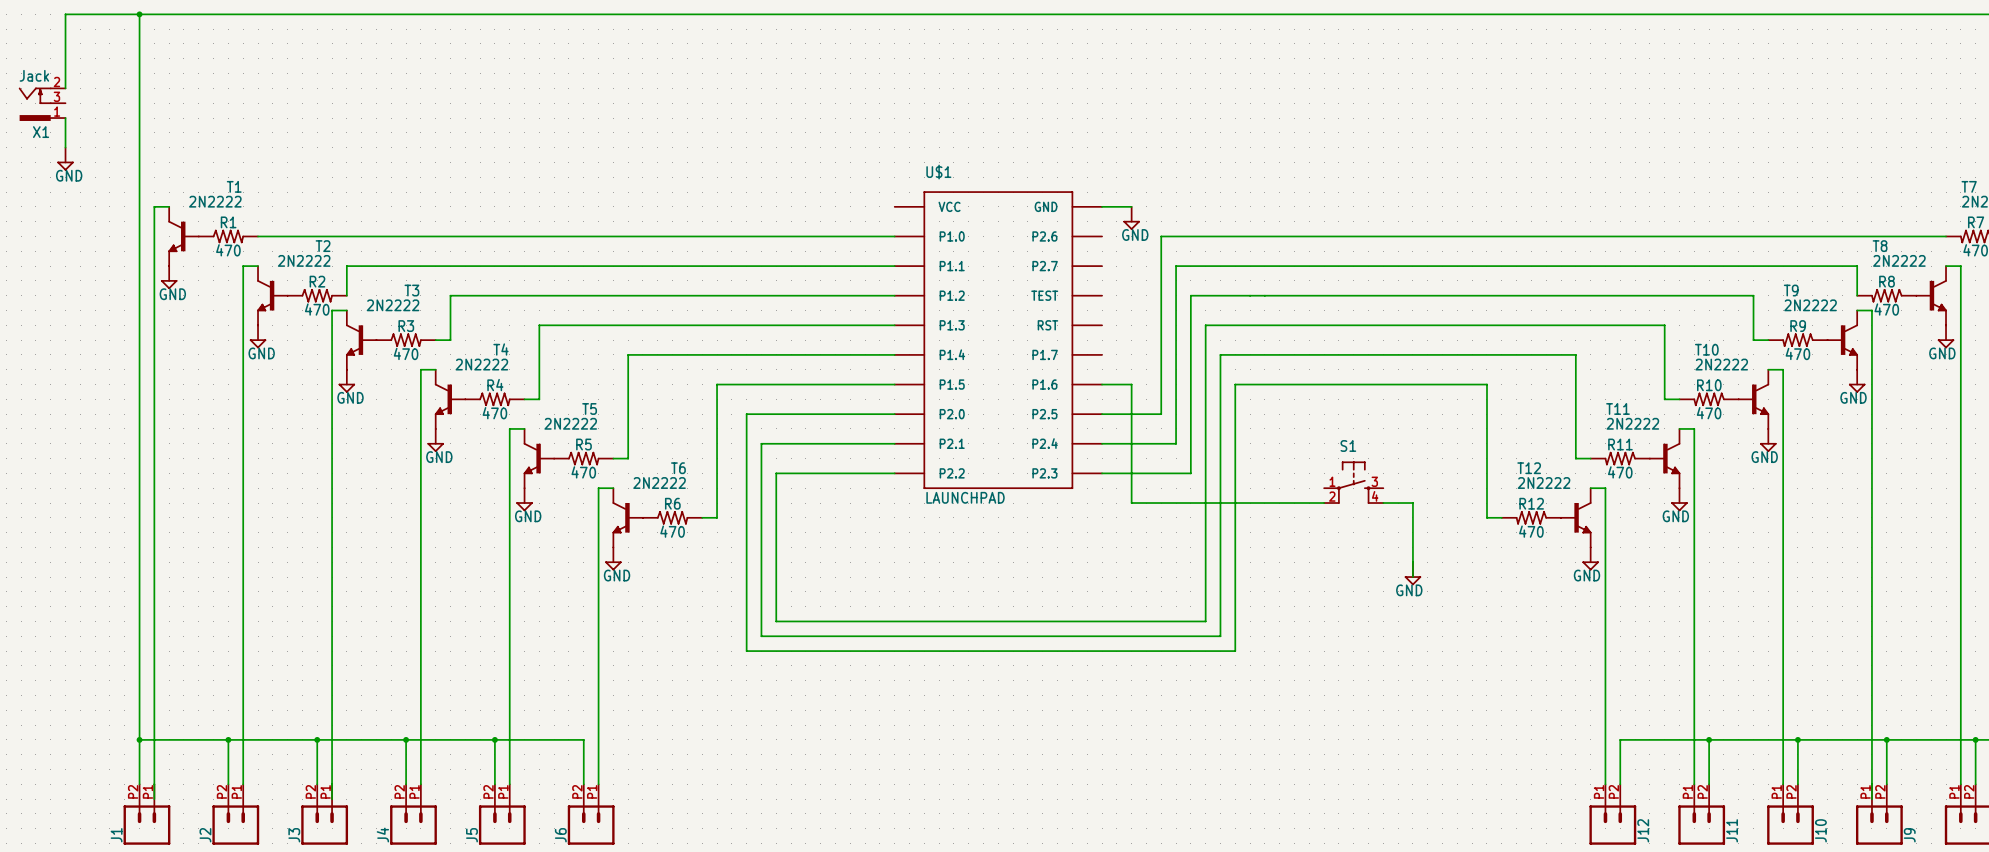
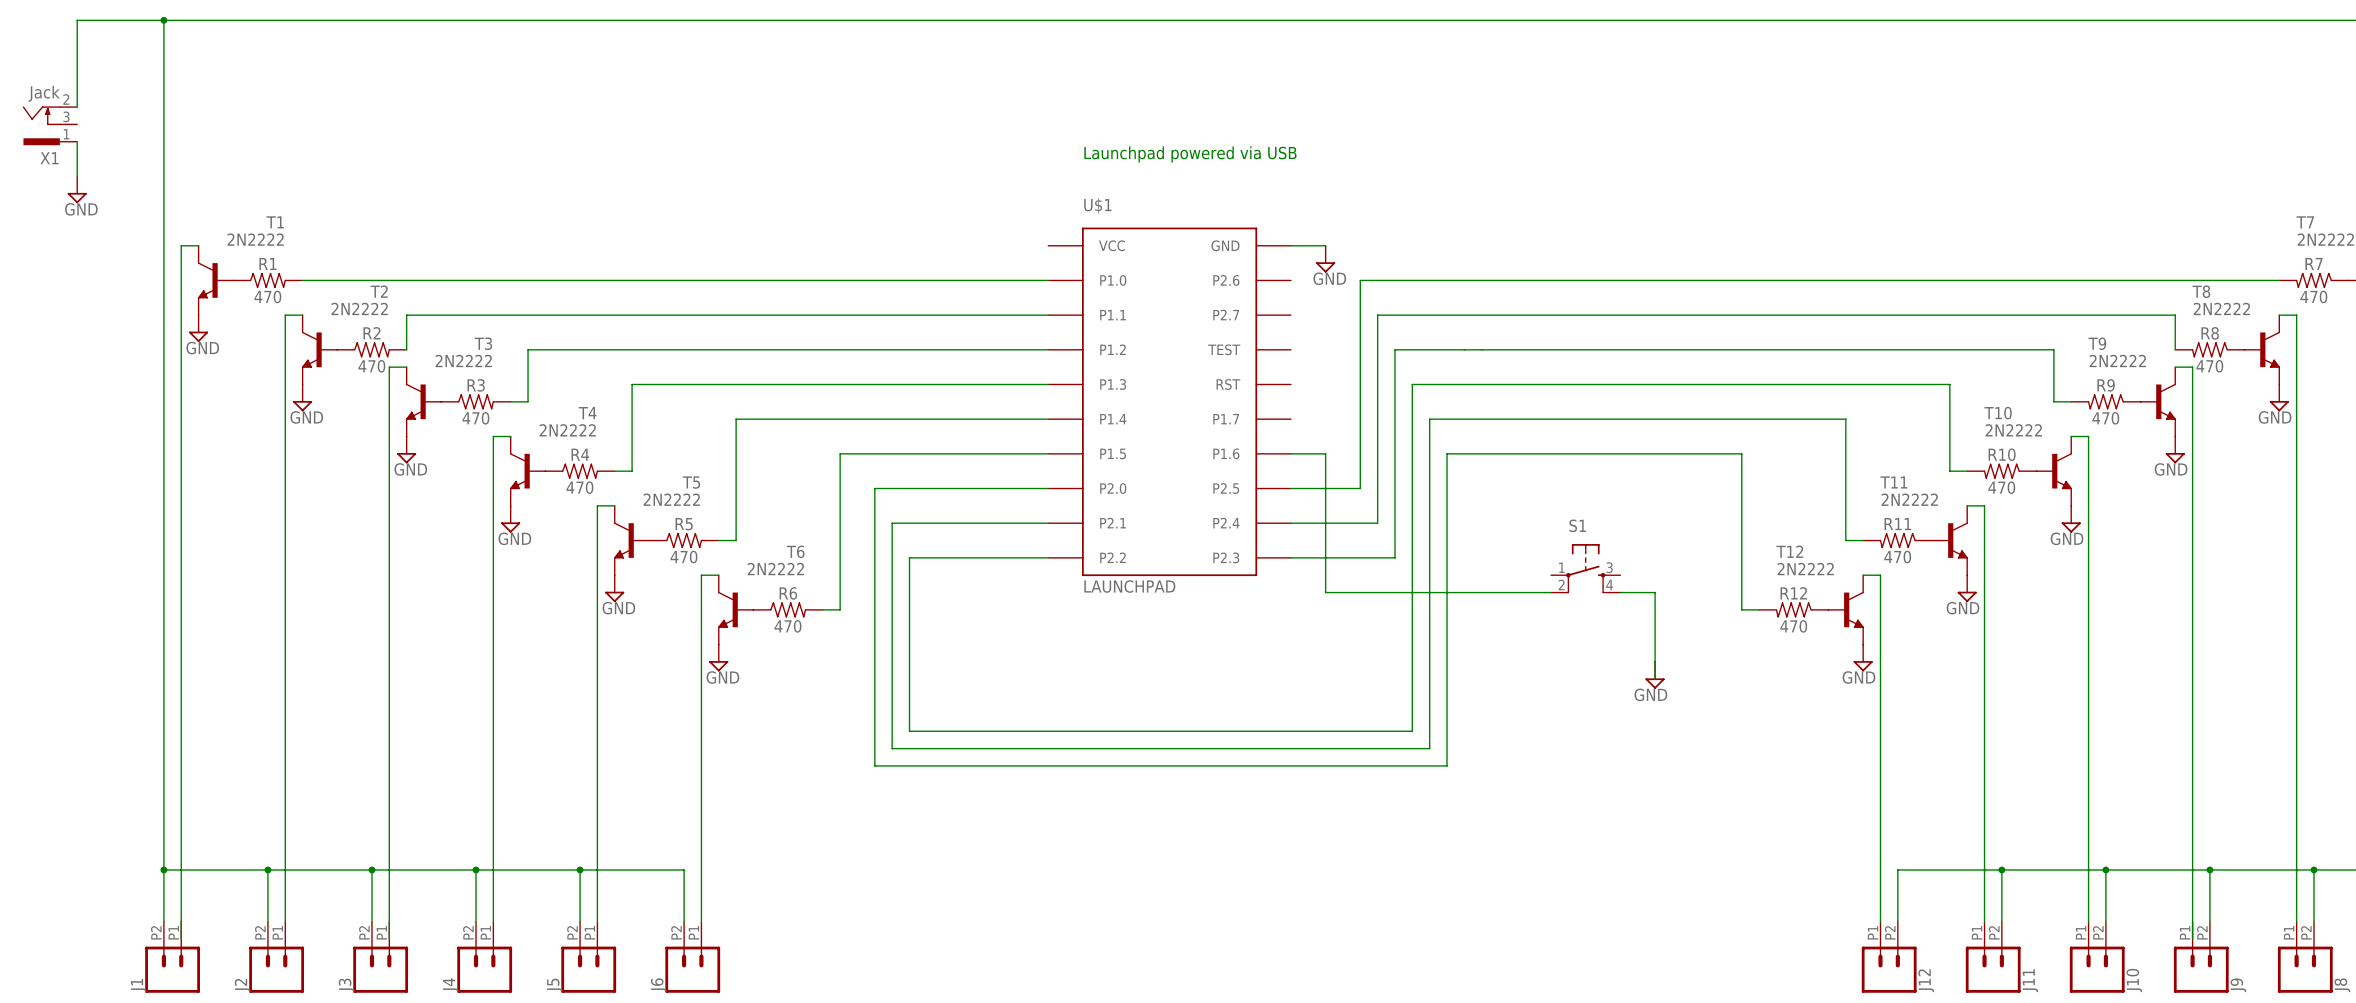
text: none -> Launchpad powered via USB (1190, 154)

